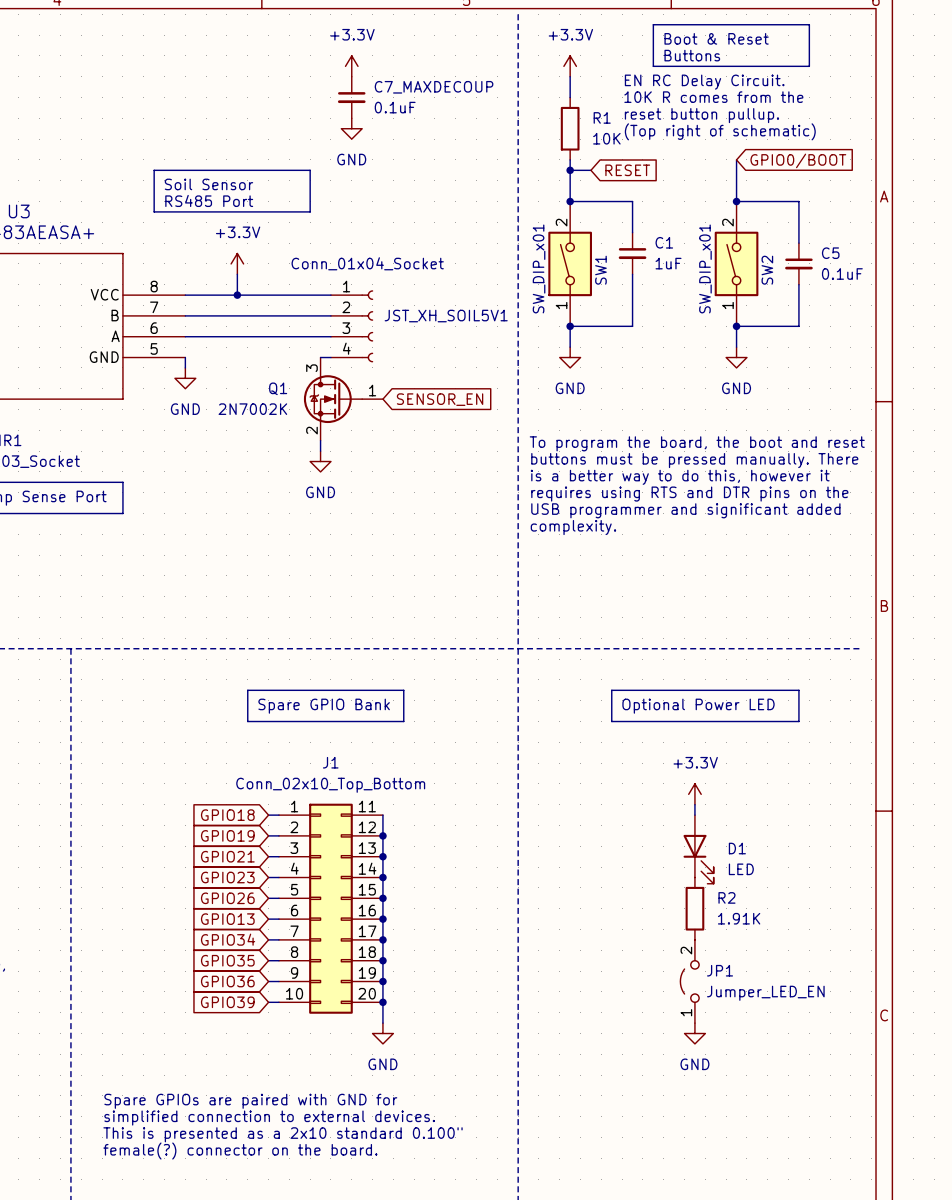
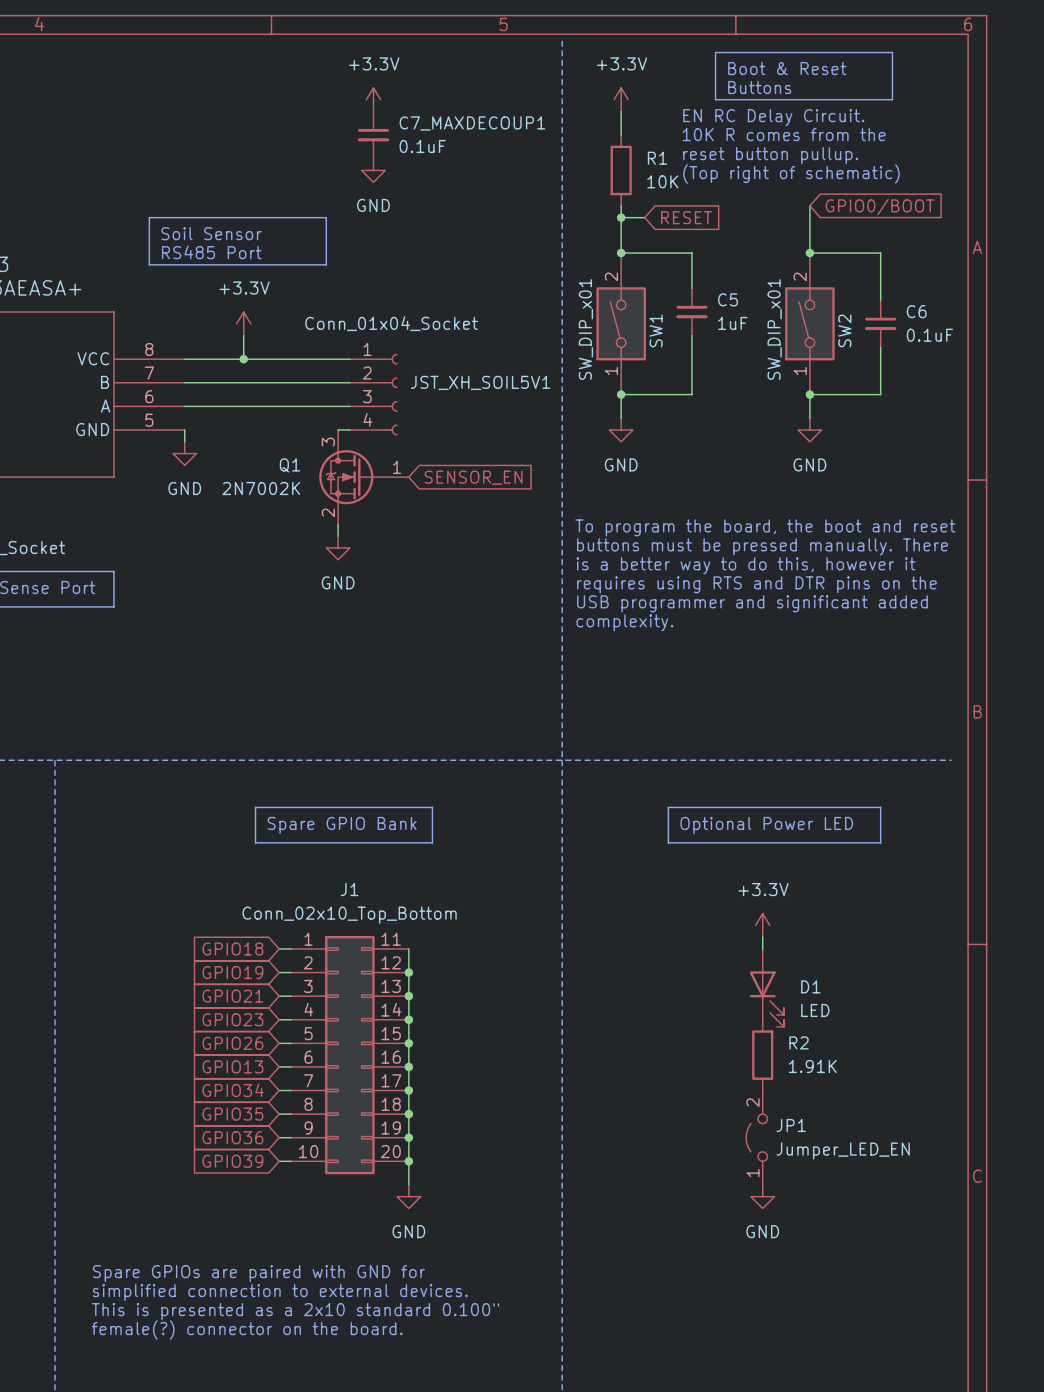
C7_MAXDECOUP name: C7_MAXDECOUP (434, 87) -> C7_MAXDECOUP1 (472, 123)
C1 name: C1 (664, 242) -> C5 (727, 299)
C5 name: C5 (830, 253) -> C6 (916, 311)

